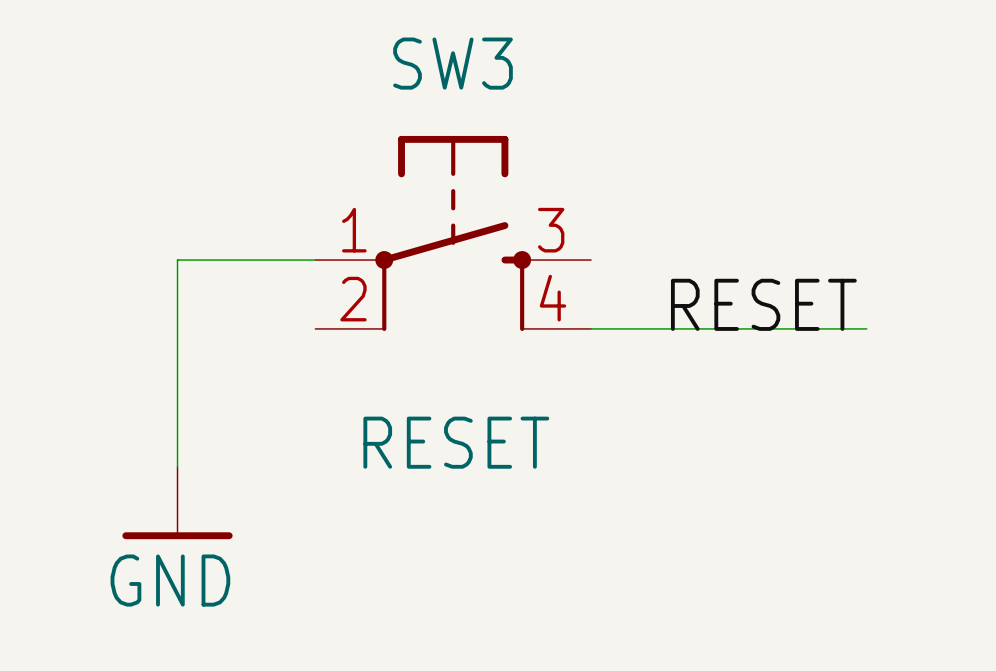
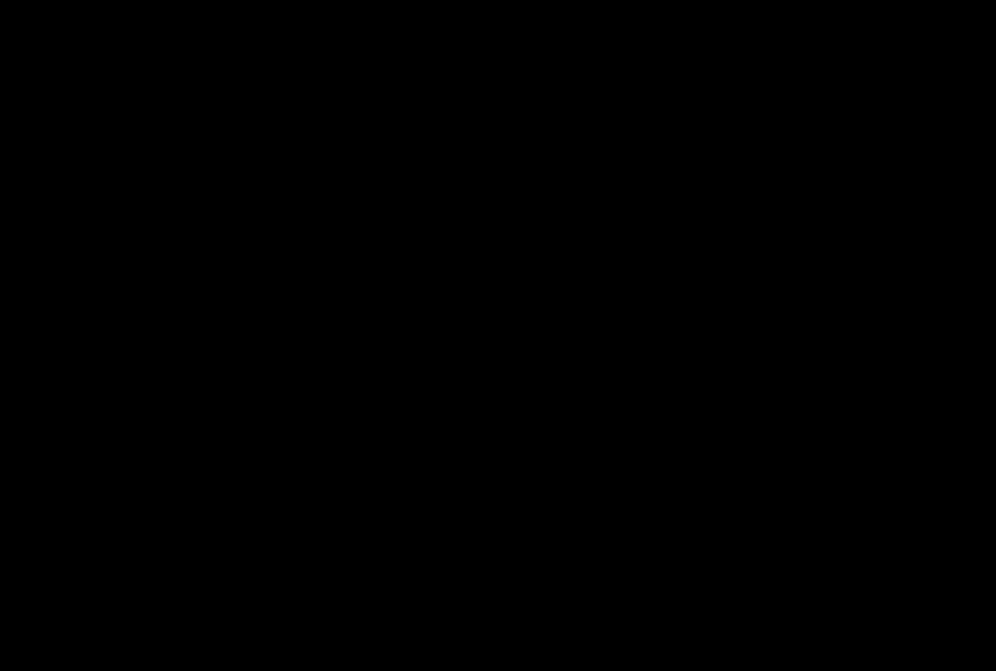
SW3: RESET (453, 233) -> none
wire: (315, 260) (177, 260) (177, 466) -> none
label: RESET (763, 304) -> none
wire: (591, 328) (866, 328) -> none
power symbol: GND (177, 502) -> none

